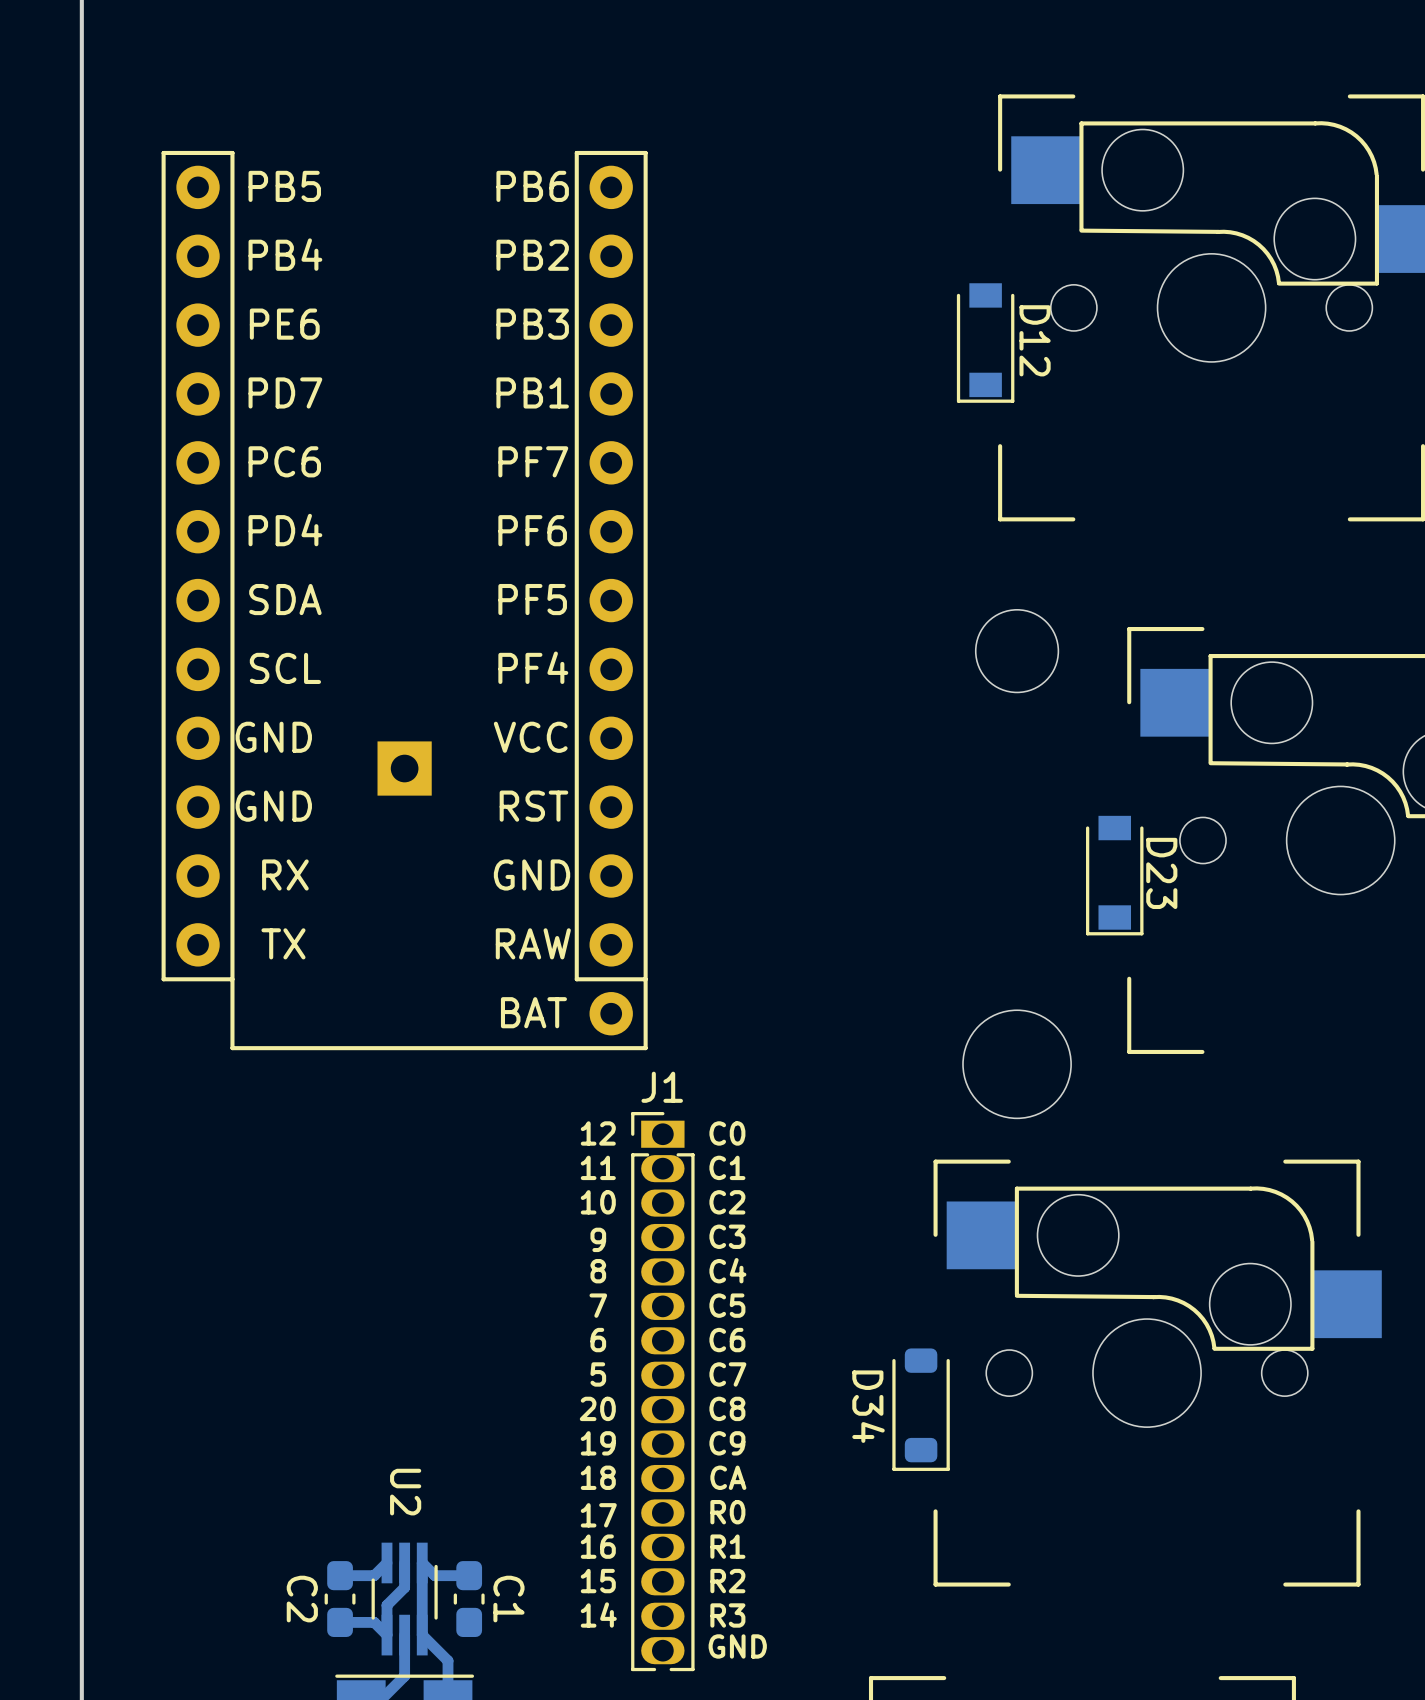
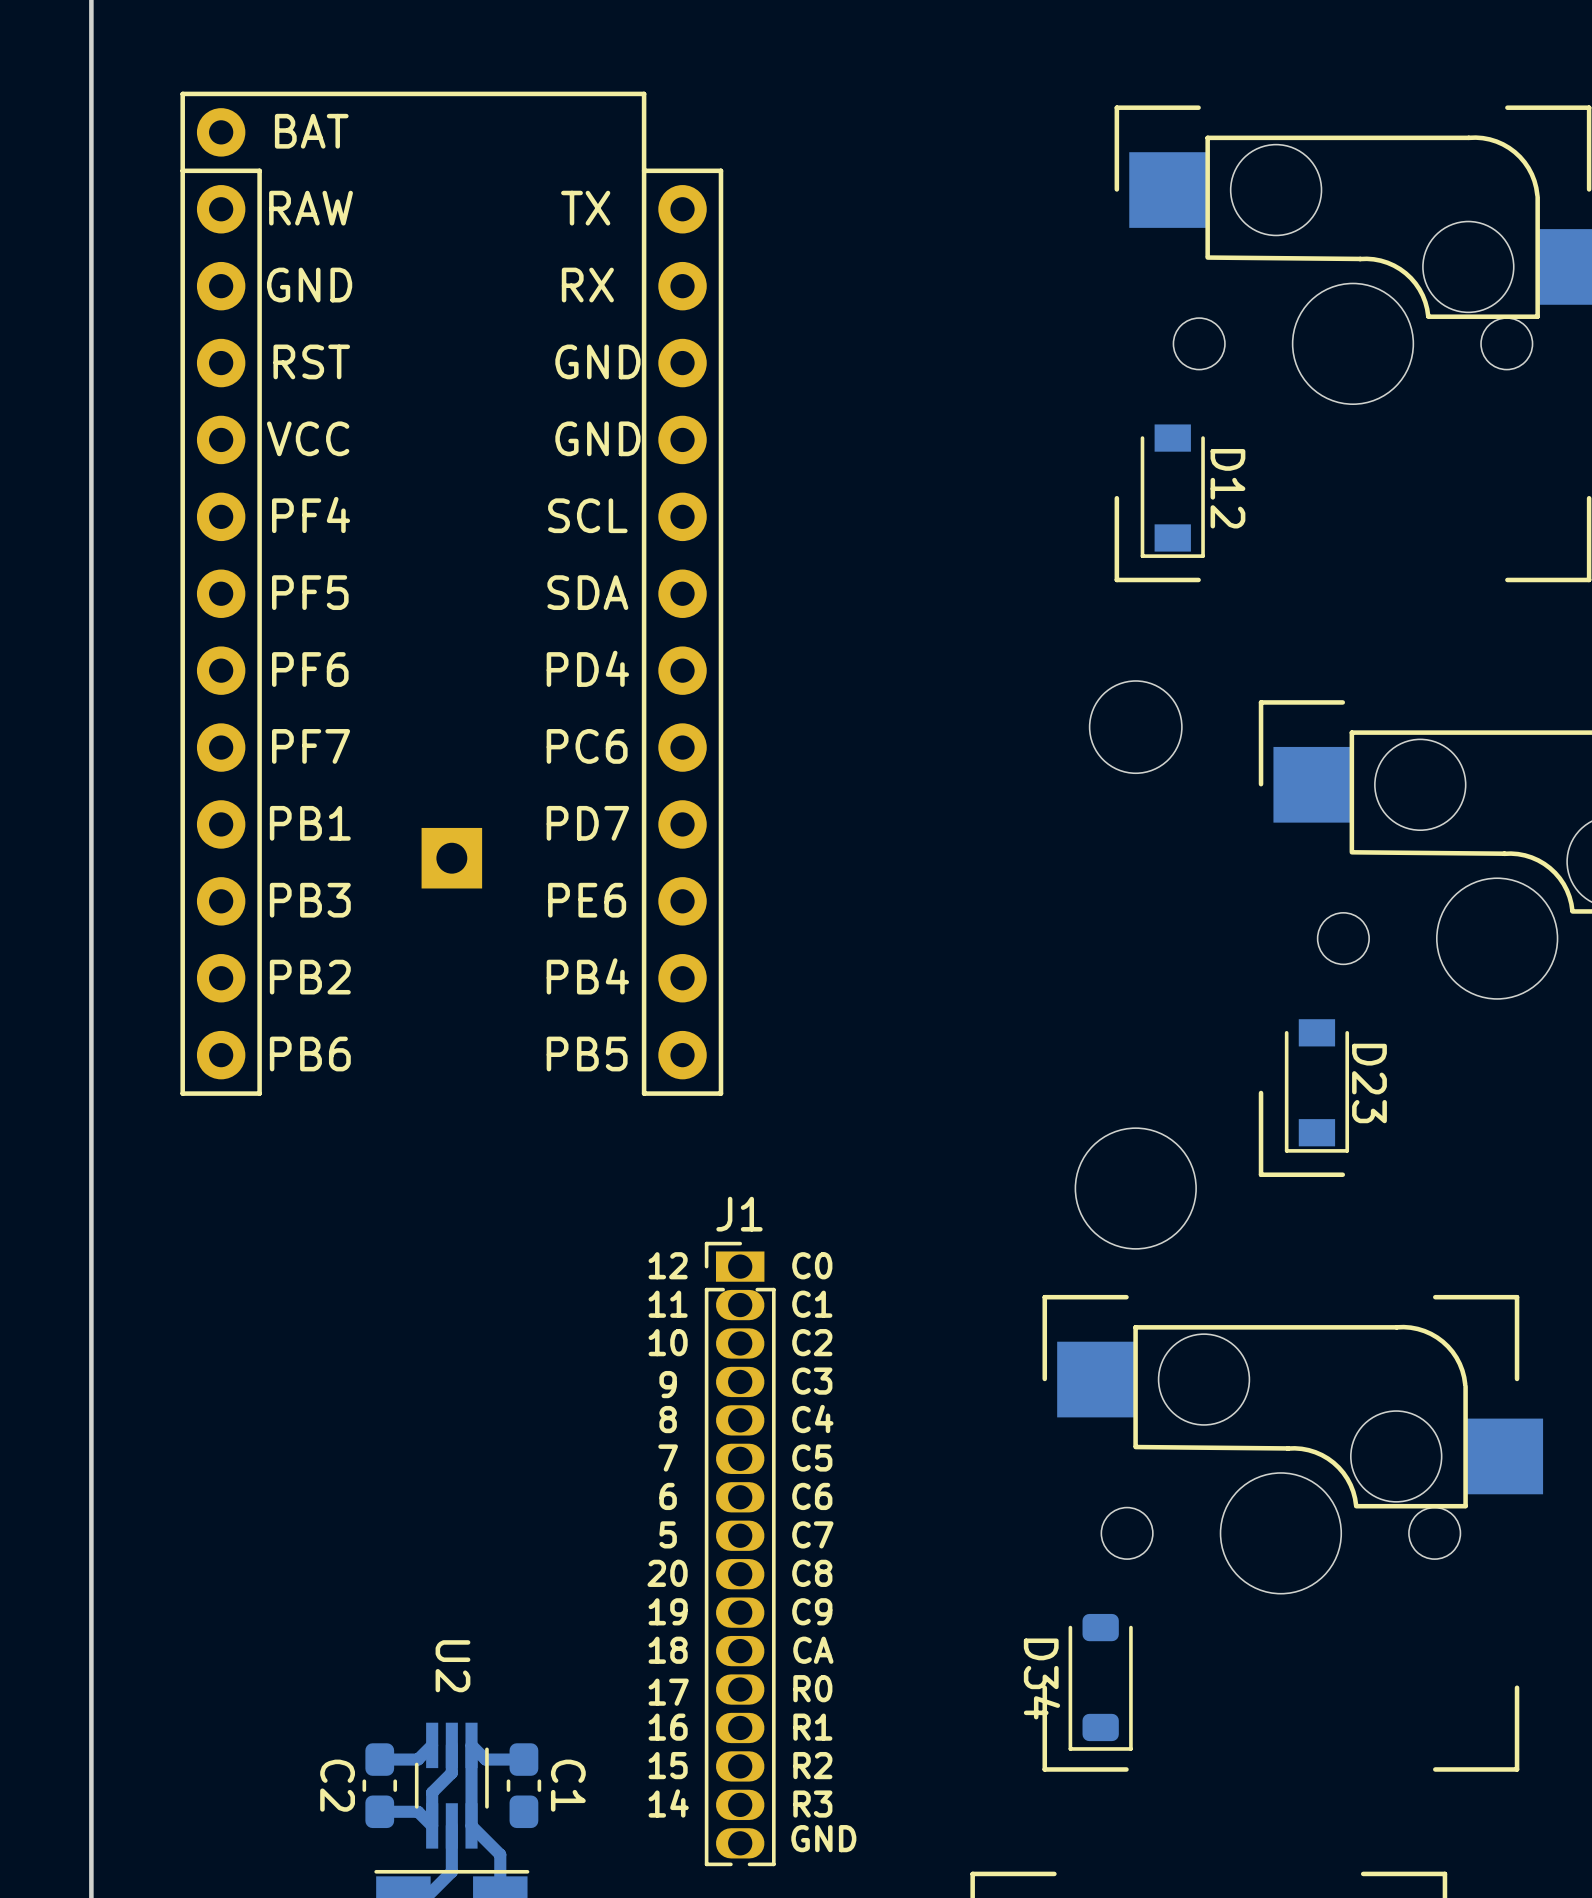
D12 position: (985, 343) -> (1172, 491)
part rotation: 0° (404, 600) -> 180° (451, 593)
D23 position: (1114, 875) -> (1316, 1085)
D34 position: (921, 1409) -> (1100, 1682)

